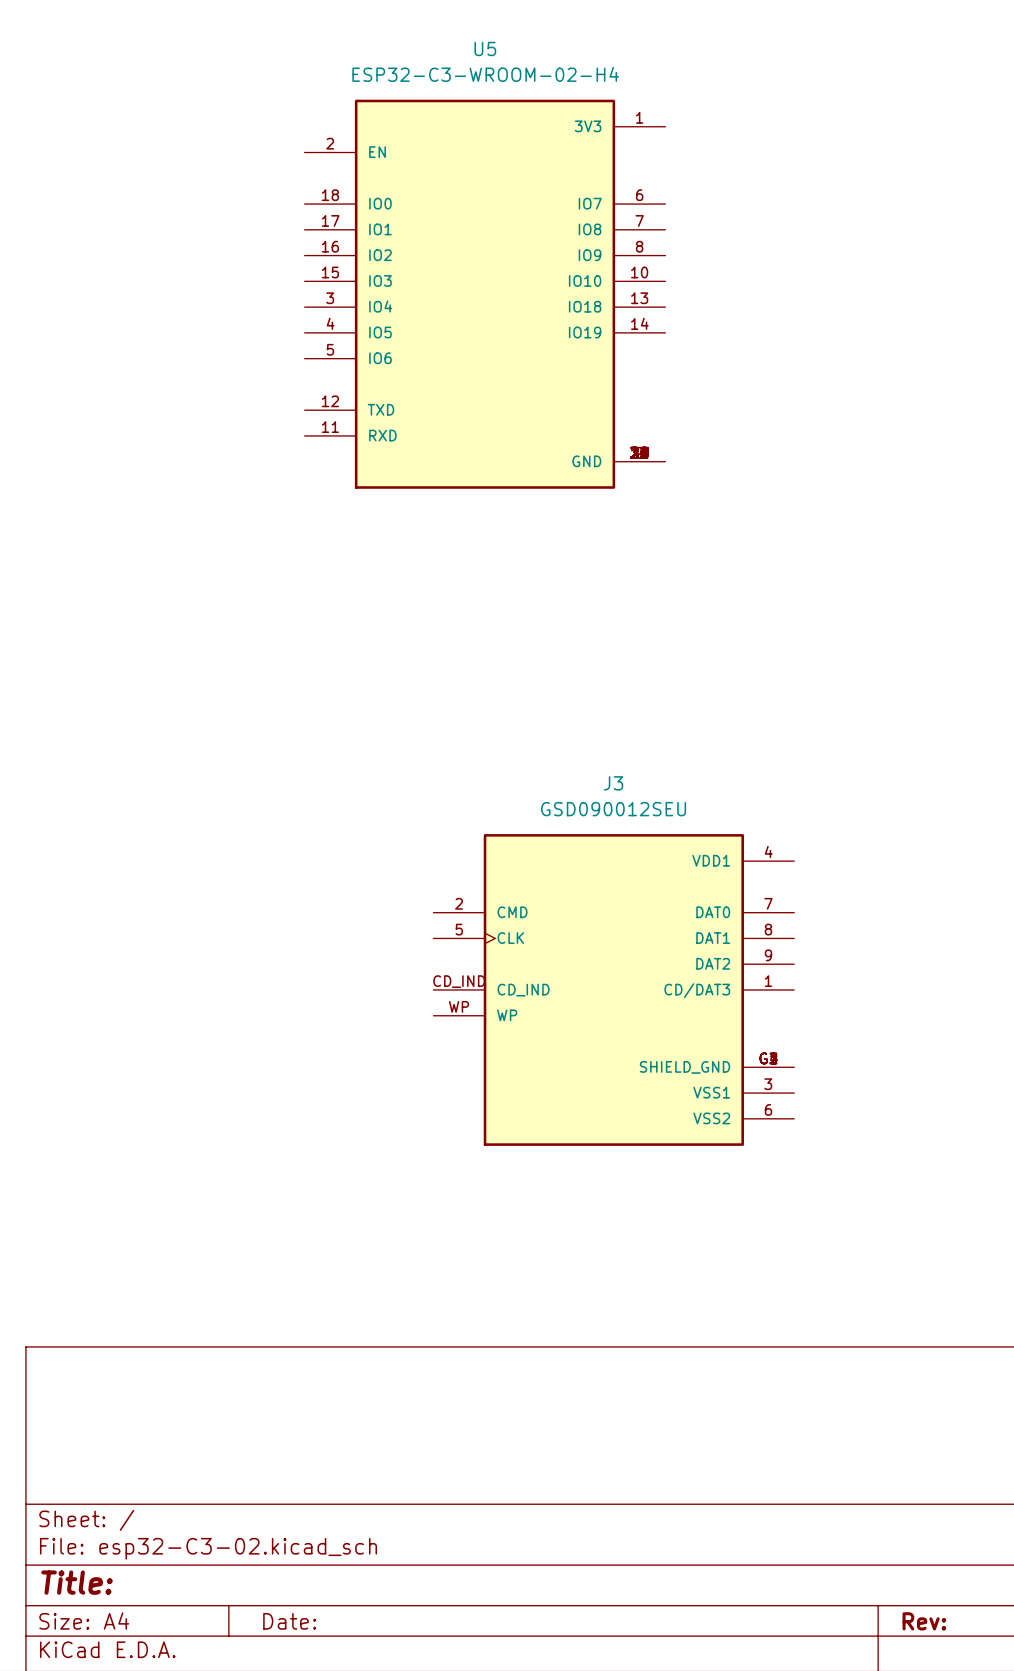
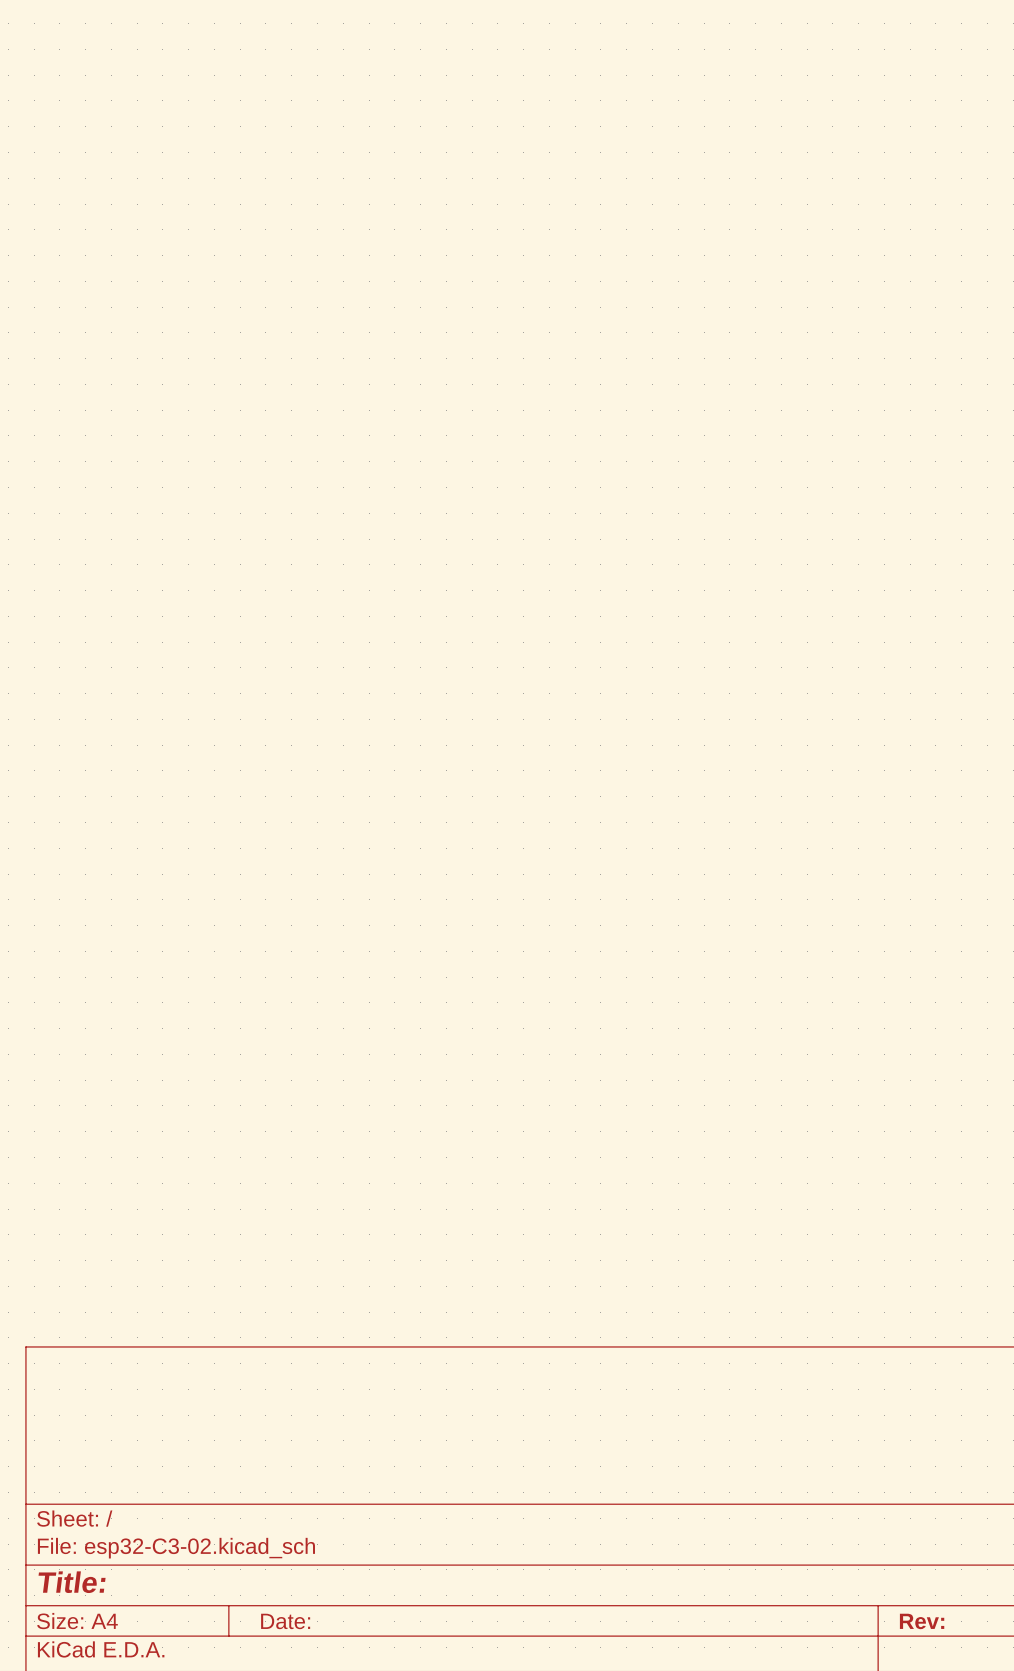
U5: ESP32-C3-WROOM-02-H4 (485, 294) -> none
J3: GSD090012SEU (613, 989) -> none

